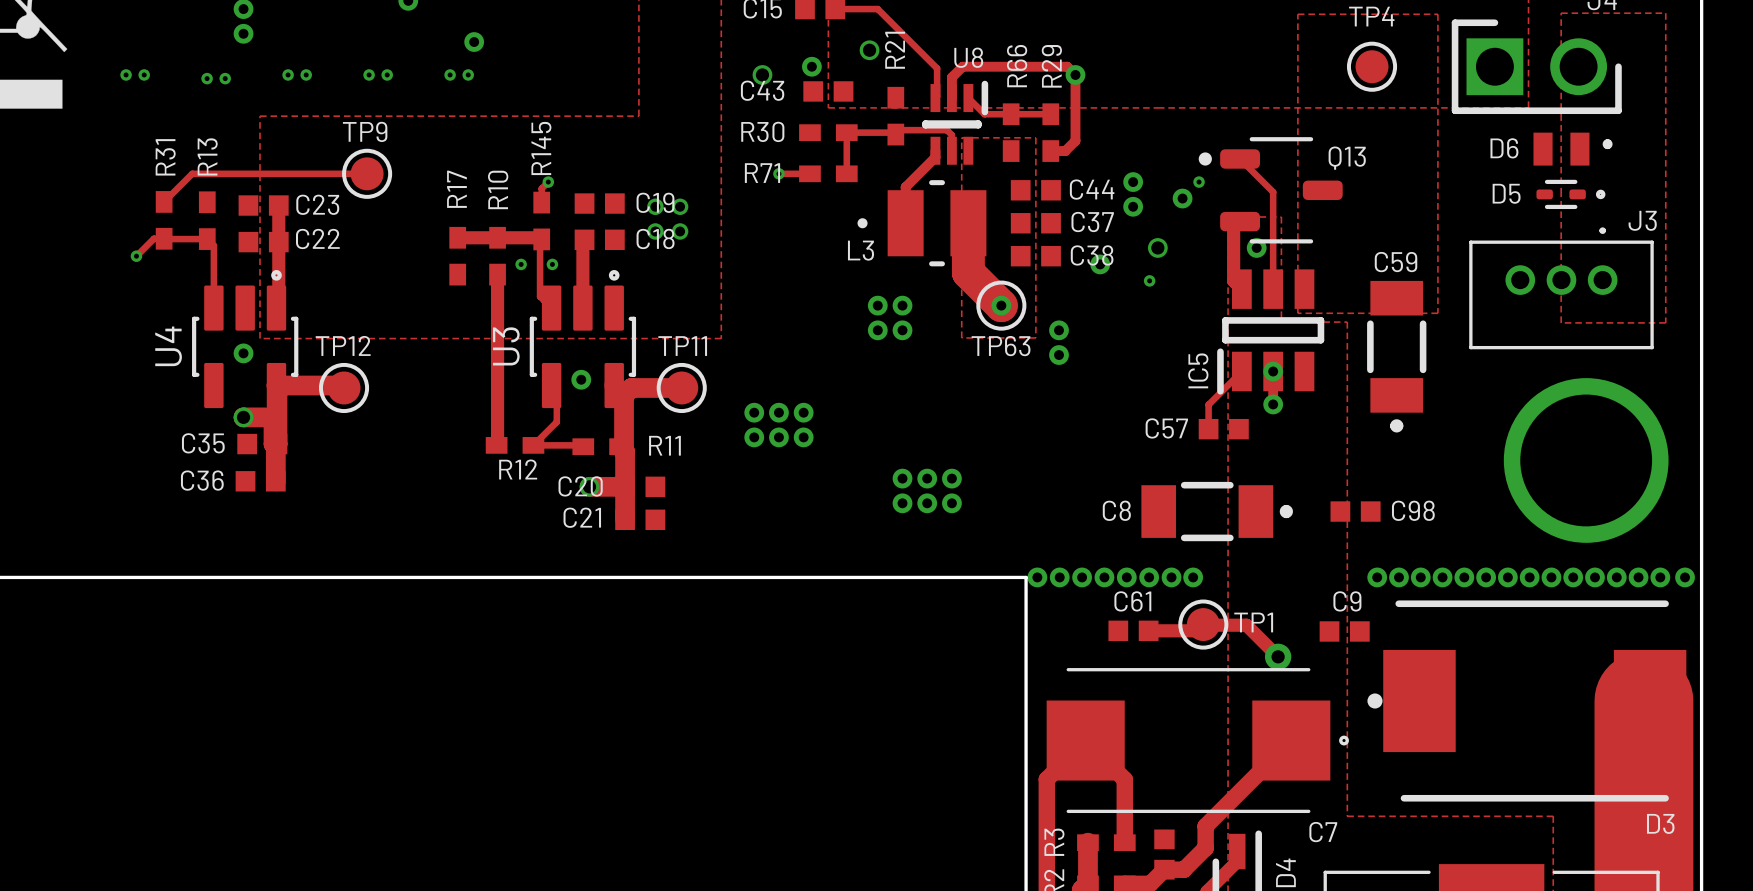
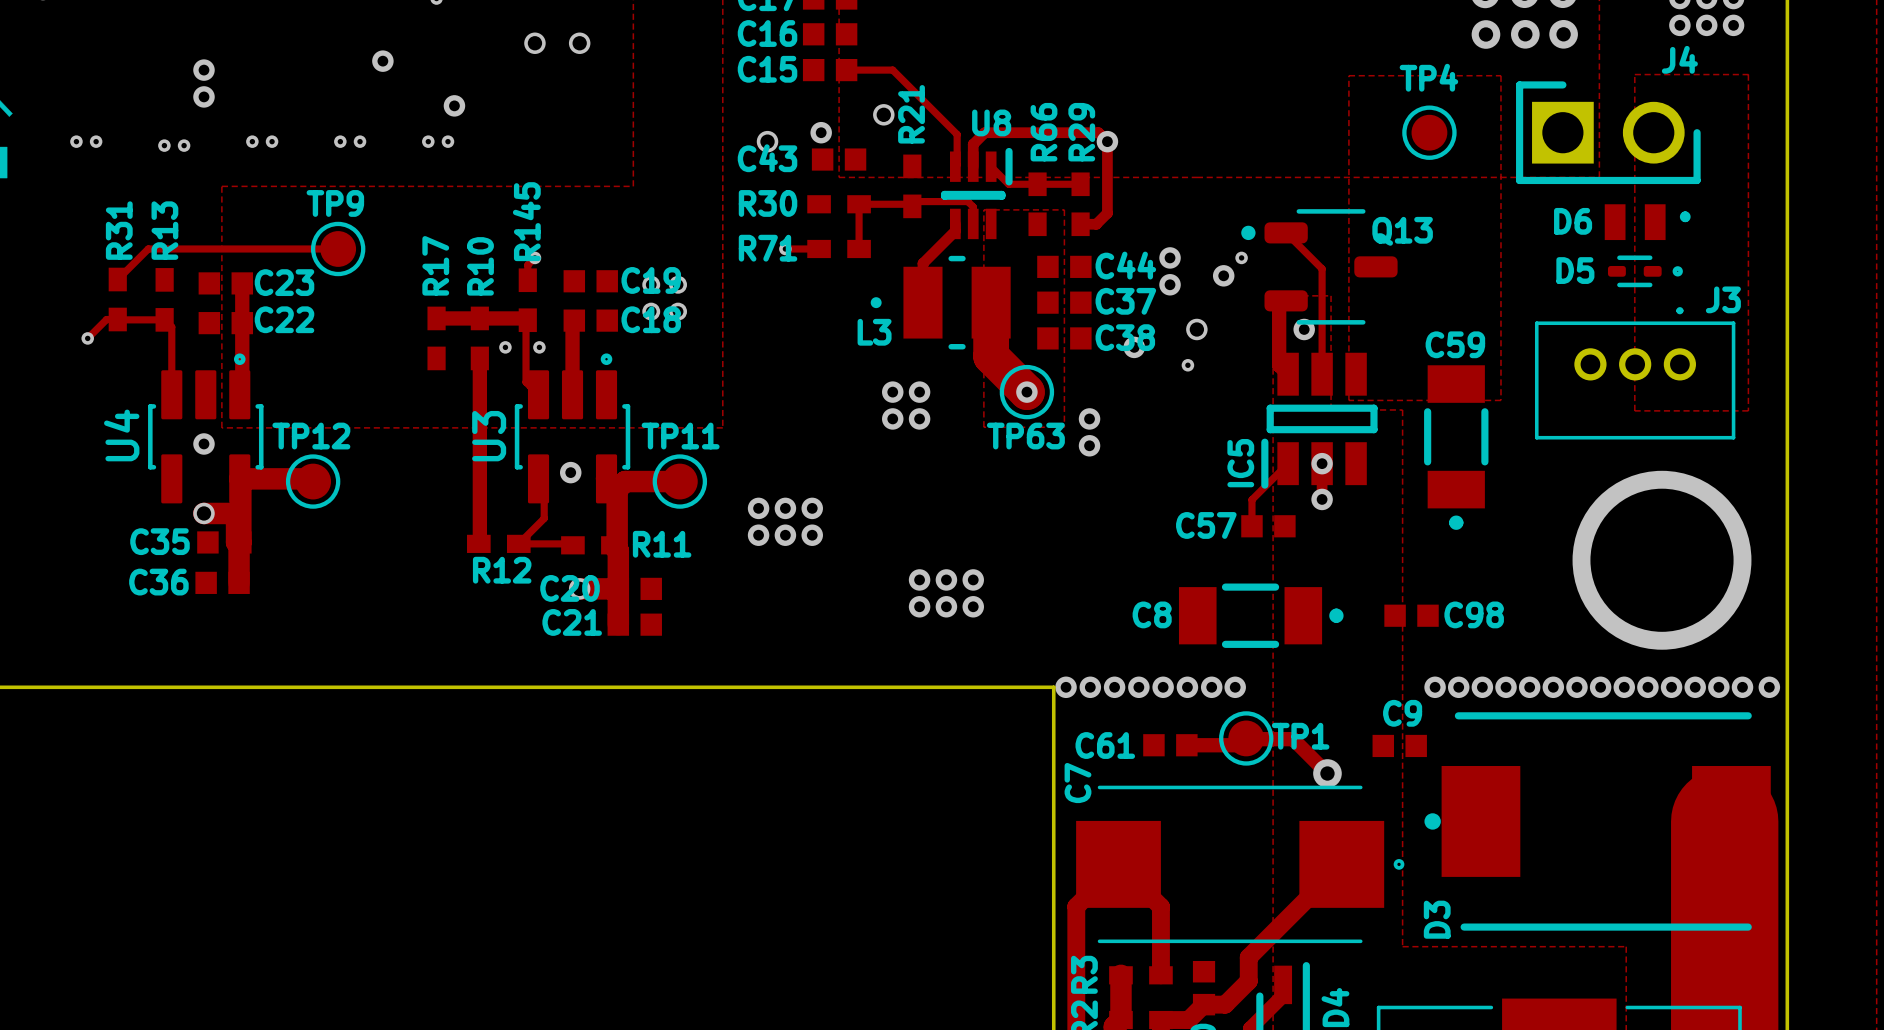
C61 name position: C61 (1132, 601) -> C61 (1105, 745)
D3 name rotation: 0° (1660, 823) -> 90° counterclockwise (1437, 919)
D3 name position: D3 (1660, 823) -> D3 (1437, 919)
C7 name rotation: 0° (1323, 832) -> 90° counterclockwise (1077, 783)
C7 name position: C7 (1323, 832) -> C7 (1077, 783)

